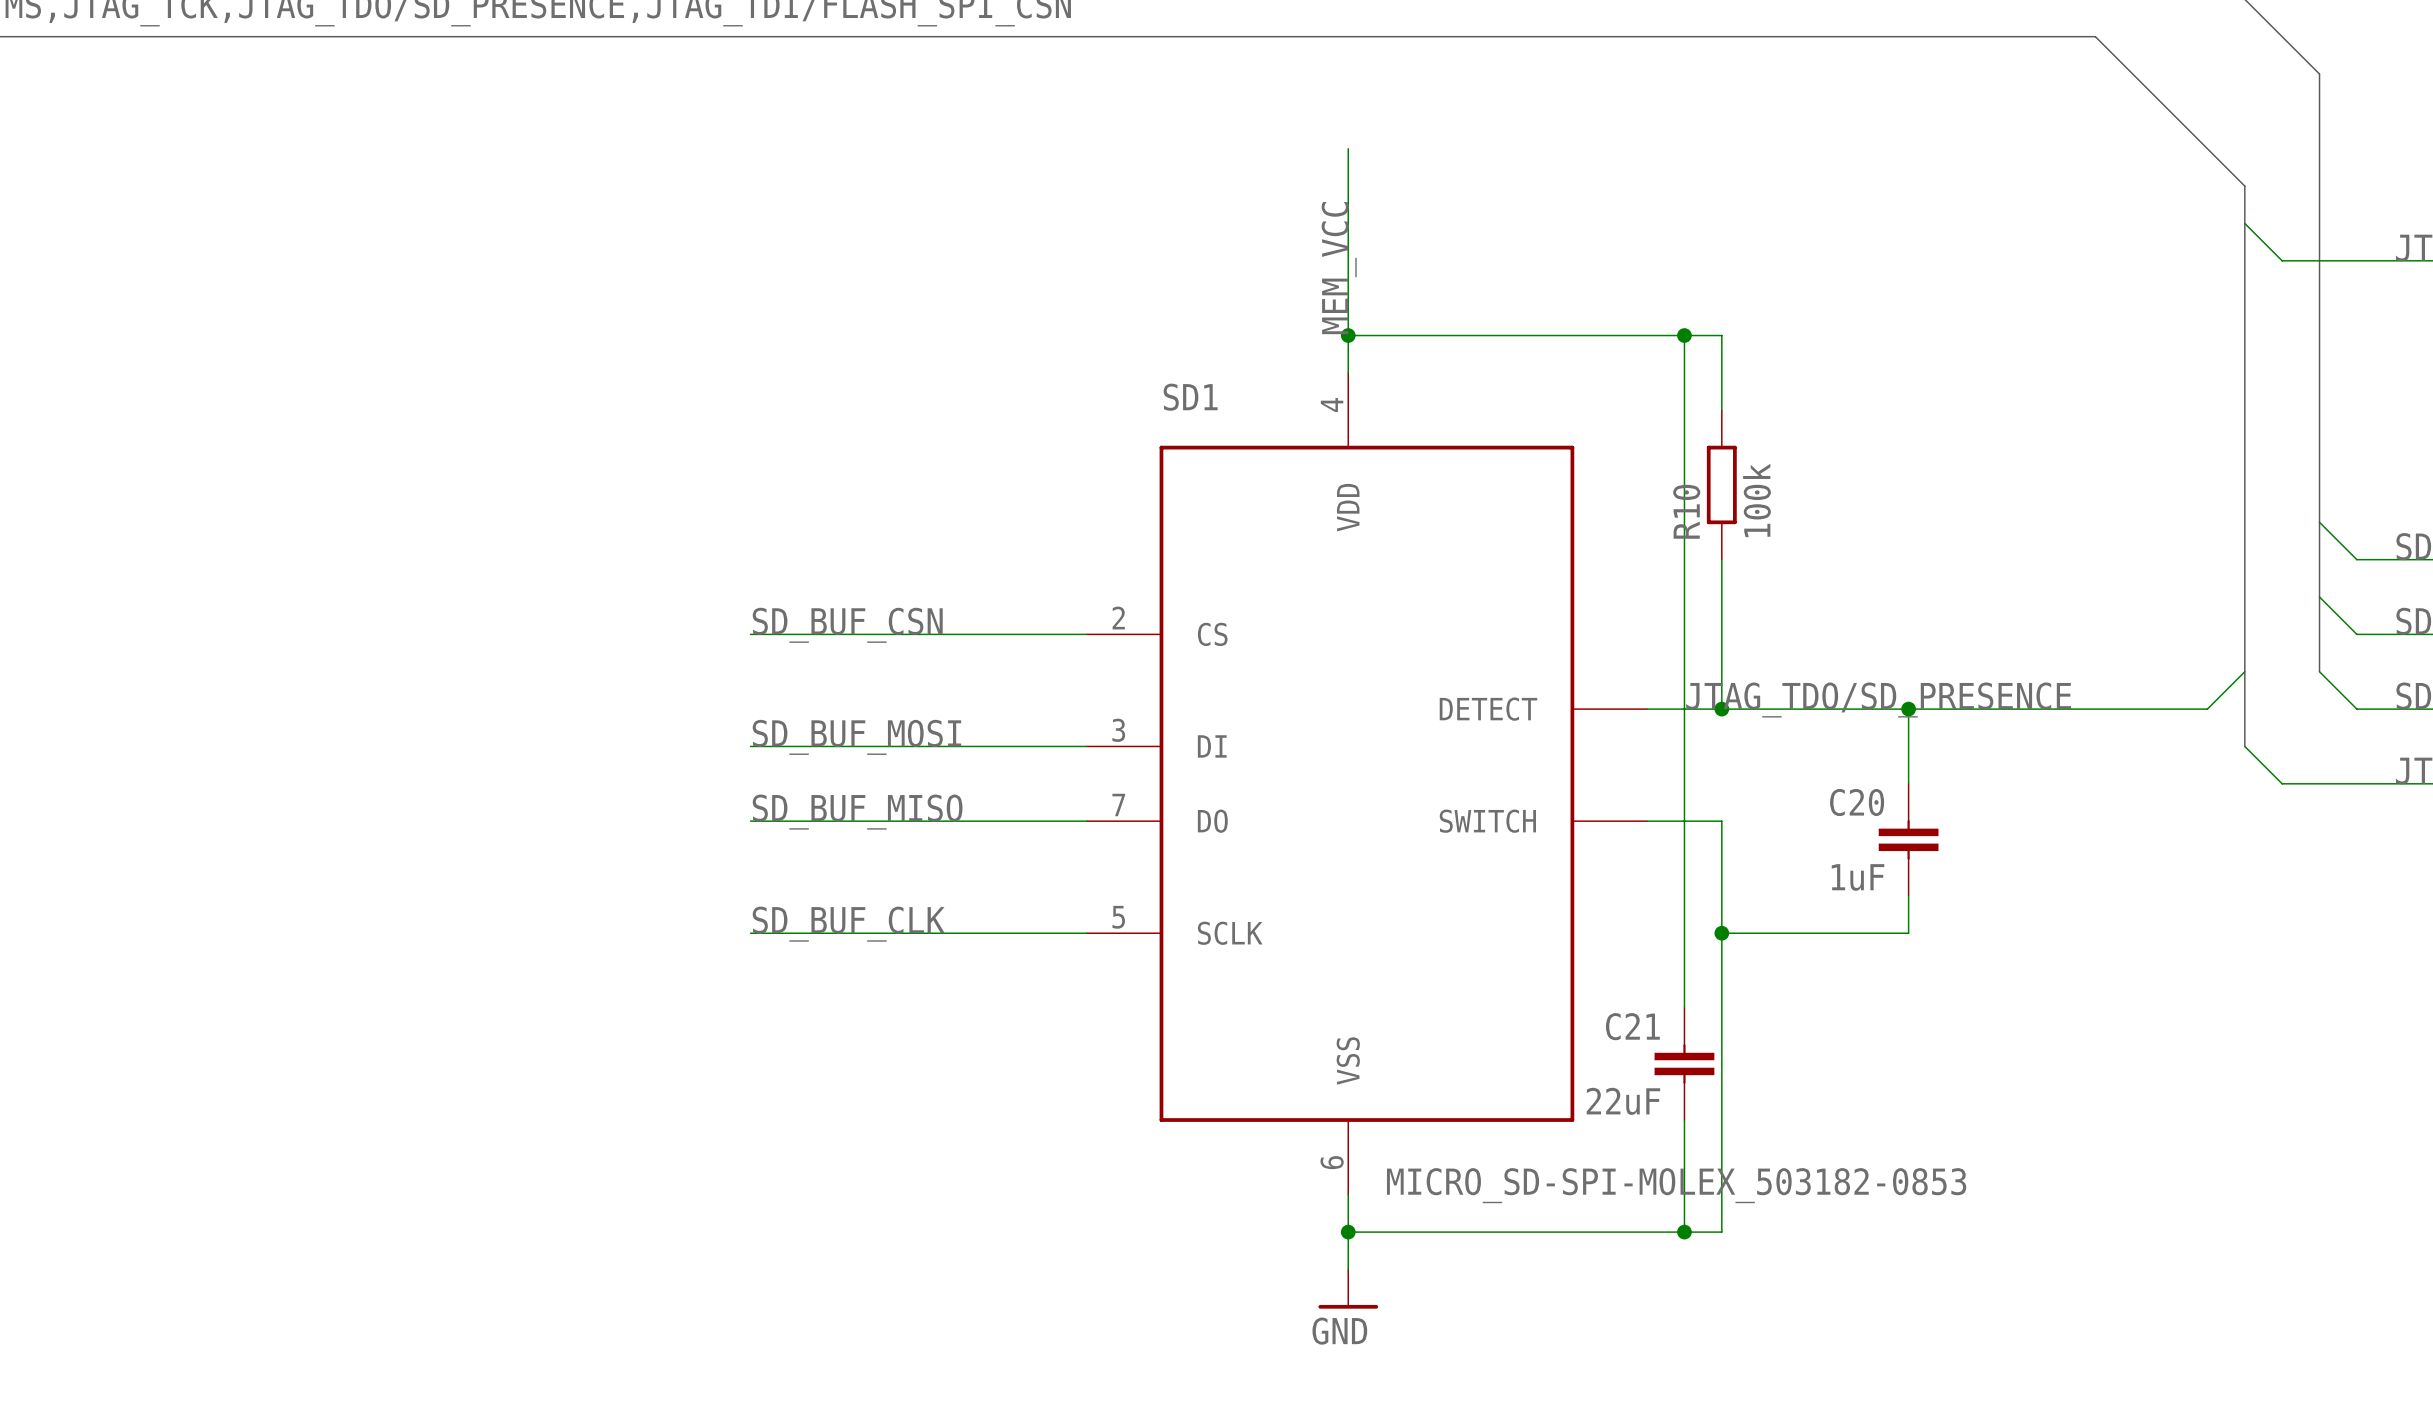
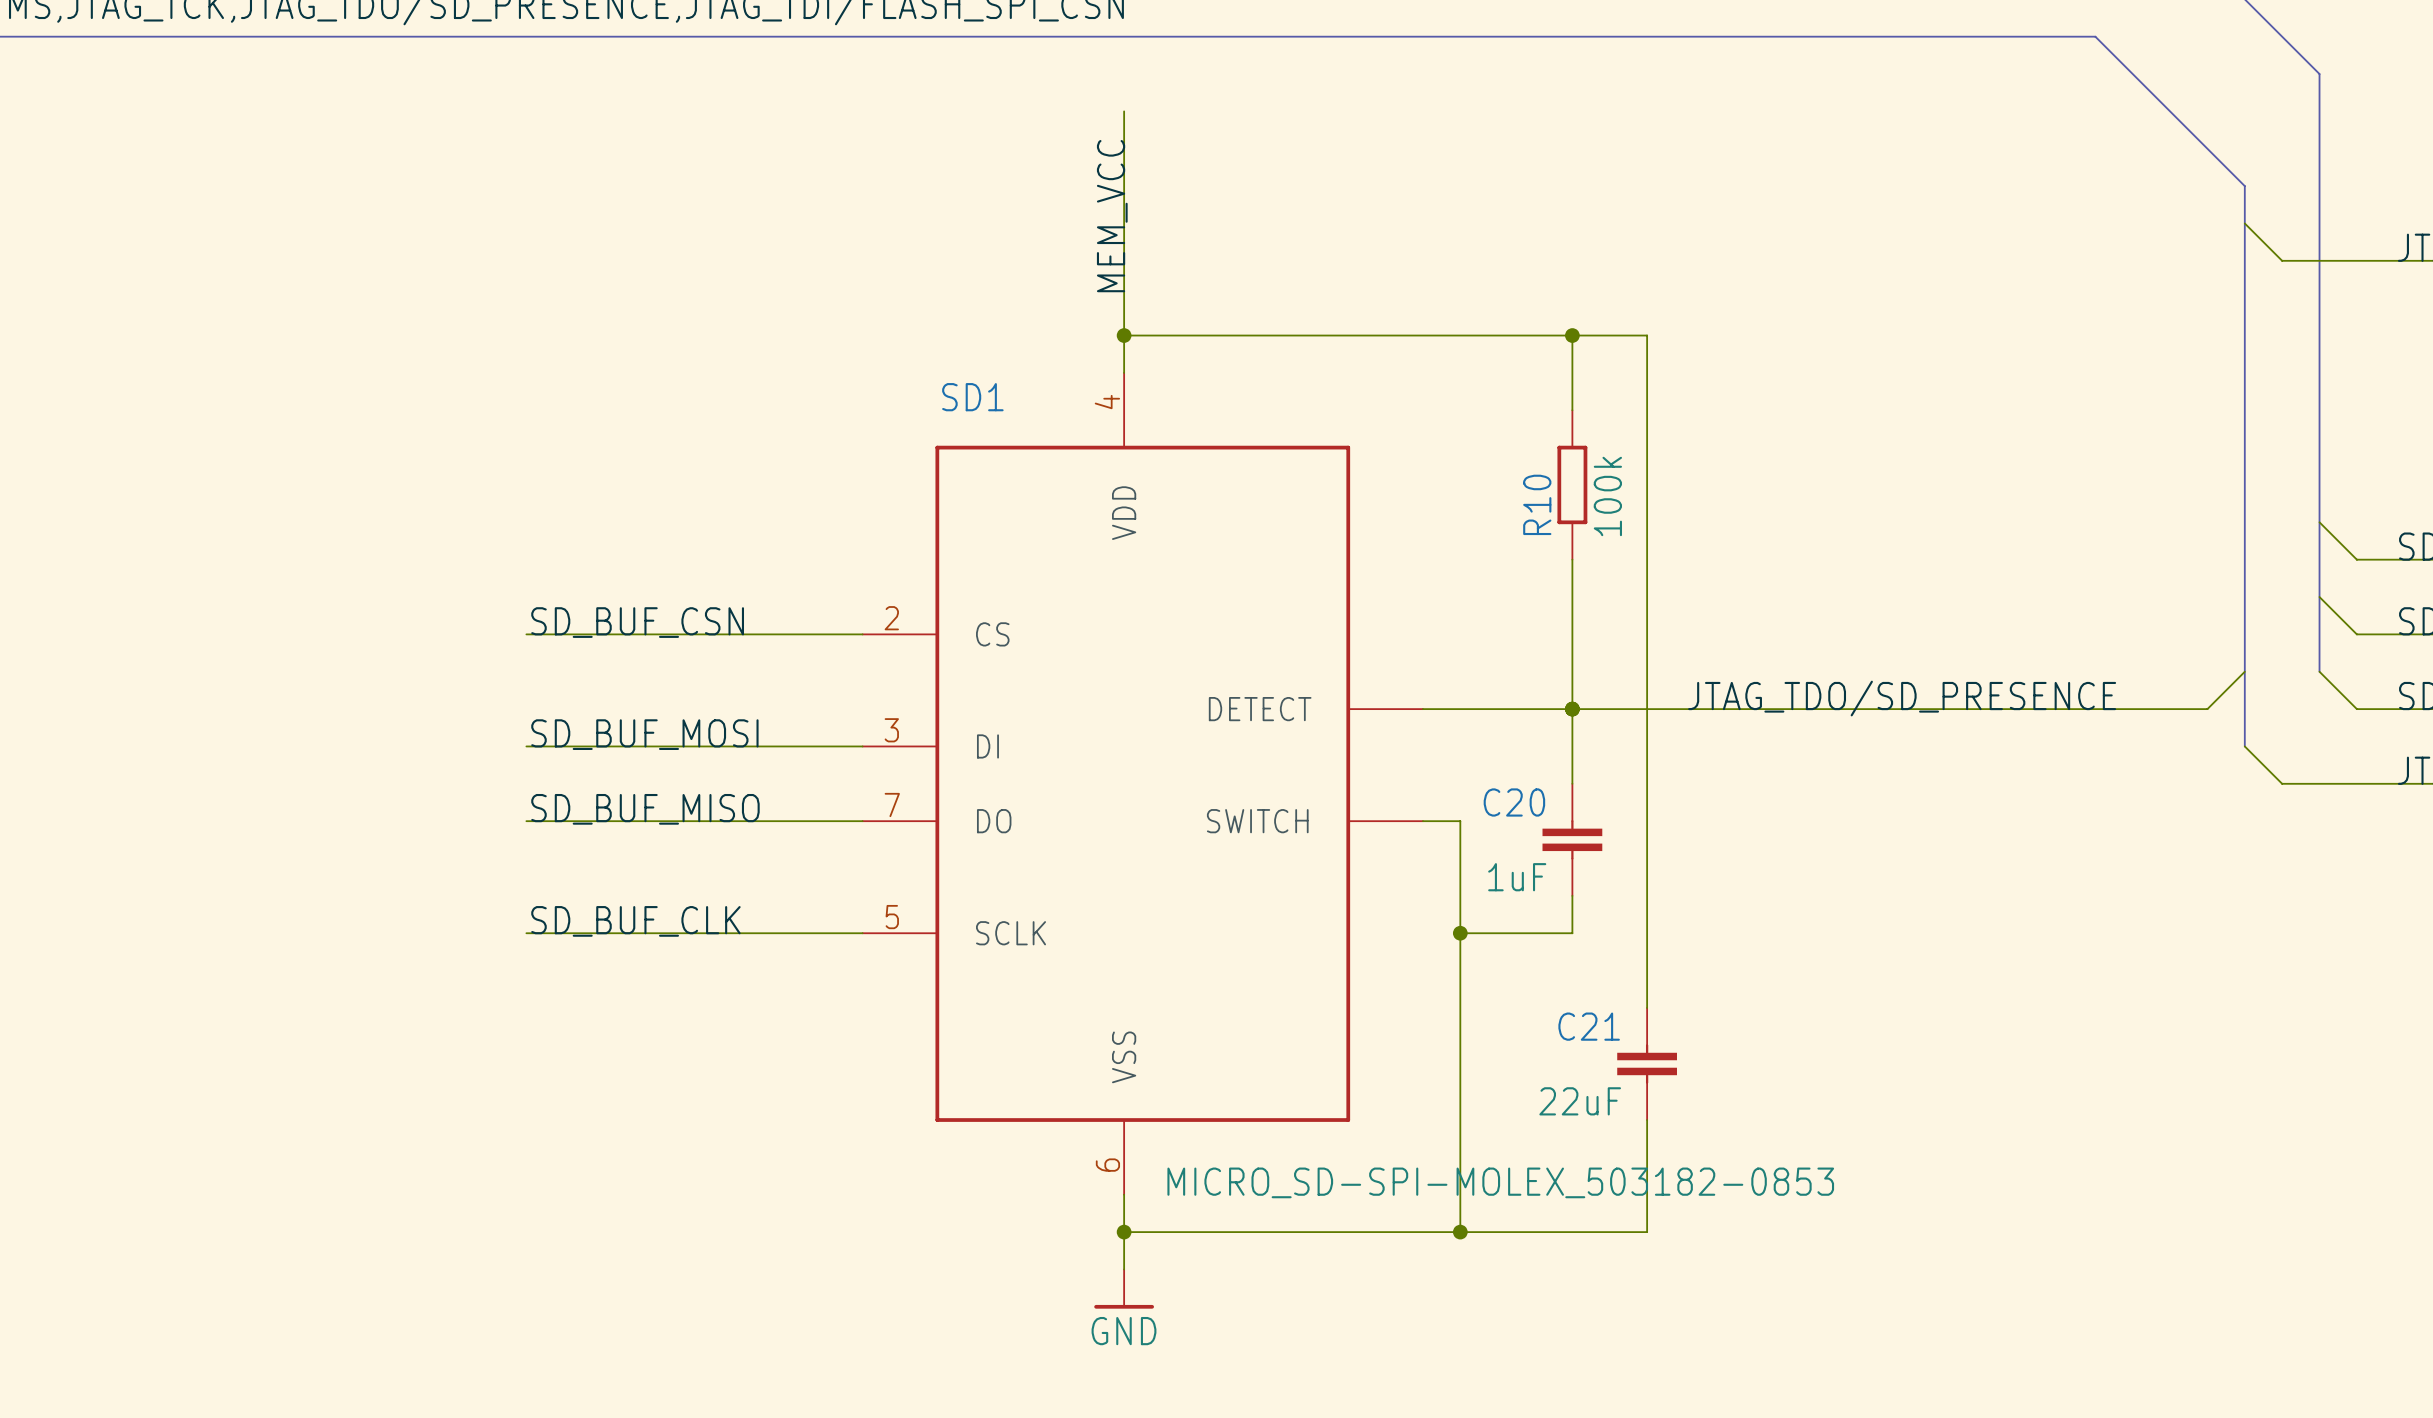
wire: none -> (1124, 111) (1124, 372)
wire: (1348, 148) (1348, 372) -> none
label position: MEM_VCC (1339, 268) -> MEM_VCC (1112, 216)
wire: none -> (1124, 335) (1348, 335)
junction: none -> (1124, 335)
junction: (1348, 335) -> none
wire: none -> (1572, 335) (1572, 410)
junction: none -> (1572, 335)
wire: (1647, 335) (1721, 335) (1721, 410) -> (1647, 335) (1647, 1007)
wire: (1684, 335) (1684, 1007) -> none
junction: (1684, 335) -> none
R10 position: (1721, 484) -> (1572, 484)
wire: (1721, 559) (1721, 709) -> none
label position: SD_BUF_CSN (847, 625) -> SD_BUF_CSN (637, 622)
wire: (862, 634) (1086, 634) -> (526, 634) (750, 634)
wire: none -> (1422, 709) (1647, 709)
junction: none -> (1572, 709)
junction: (1721, 709) -> none
wire: (1908, 709) (1908, 783) -> none
junction: (1908, 709) -> none
label position: SD_BUF_MOSI (856, 737) -> SD_BUF_MOSI (644, 734)
wire: (862, 746) (1086, 746) -> (526, 746) (750, 746)
SD1 position: (1366, 783) -> (1142, 783)
label position: SD_BUF_MISO (857, 812) -> SD_BUF_MISO (645, 809)
wire: (862, 821) (1086, 821) -> (526, 821) (750, 821)
wire: none -> (1422, 821) (1460, 821) (1460, 1232)
wire: (1647, 821) (1721, 821) (1721, 1232) (1647, 1232) -> (1647, 1120) (1647, 1232)
C20 position: (1908, 839) -> (1572, 839)
wire: none -> (1572, 895) (1572, 933) (1460, 933)
wire: (1908, 895) (1908, 933) (1721, 933) -> none
label position: SD_BUF_CLK (848, 924) -> SD_BUF_CLK (635, 921)
wire: (862, 933) (1086, 933) -> (526, 933) (750, 933)
junction: none -> (1460, 933)
junction: (1721, 933) -> none
C21 position: (1684, 1063) -> (1647, 1063)
wire: (1684, 1120) (1684, 1232) -> none
wire: (1348, 1194) (1348, 1269) -> (1124, 1194) (1124, 1269)
wire: none -> (1124, 1232) (1348, 1232)
junction: none -> (1124, 1232)
junction: (1348, 1232) -> none
junction: none -> (1460, 1232)
junction: (1684, 1232) -> none
power symbol position: GND (1348, 1289) -> GND (1124, 1289)

